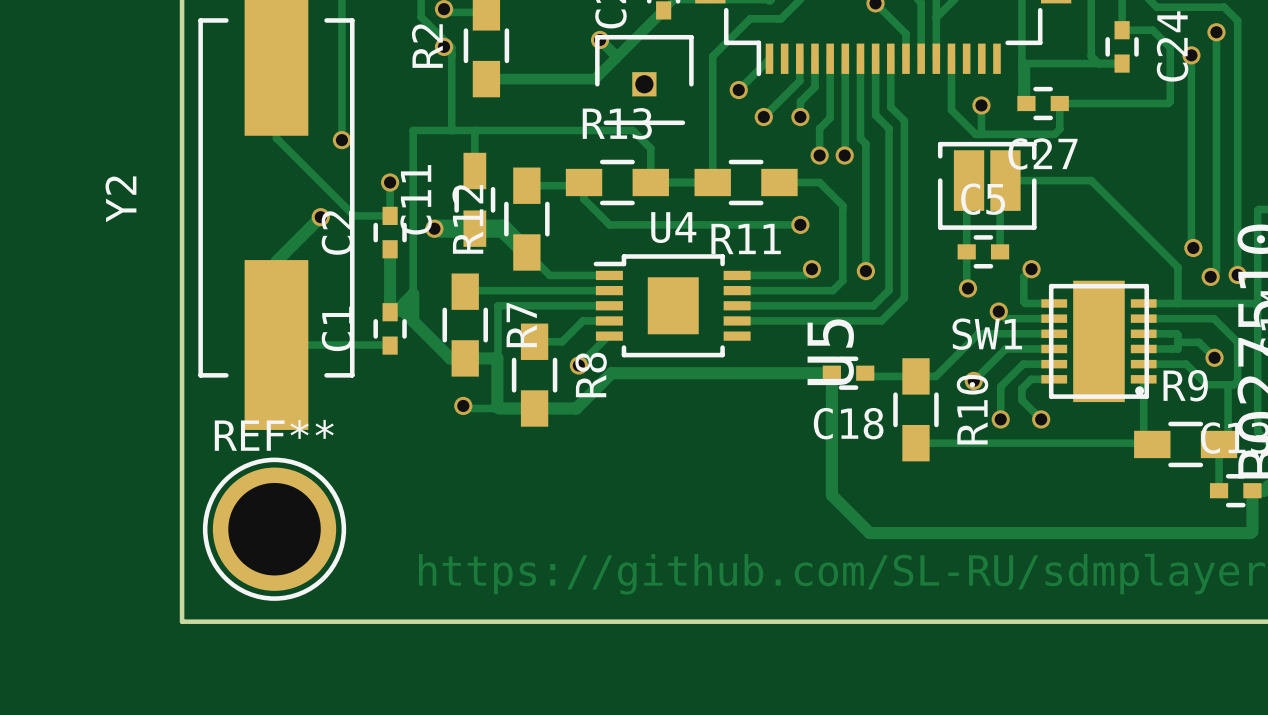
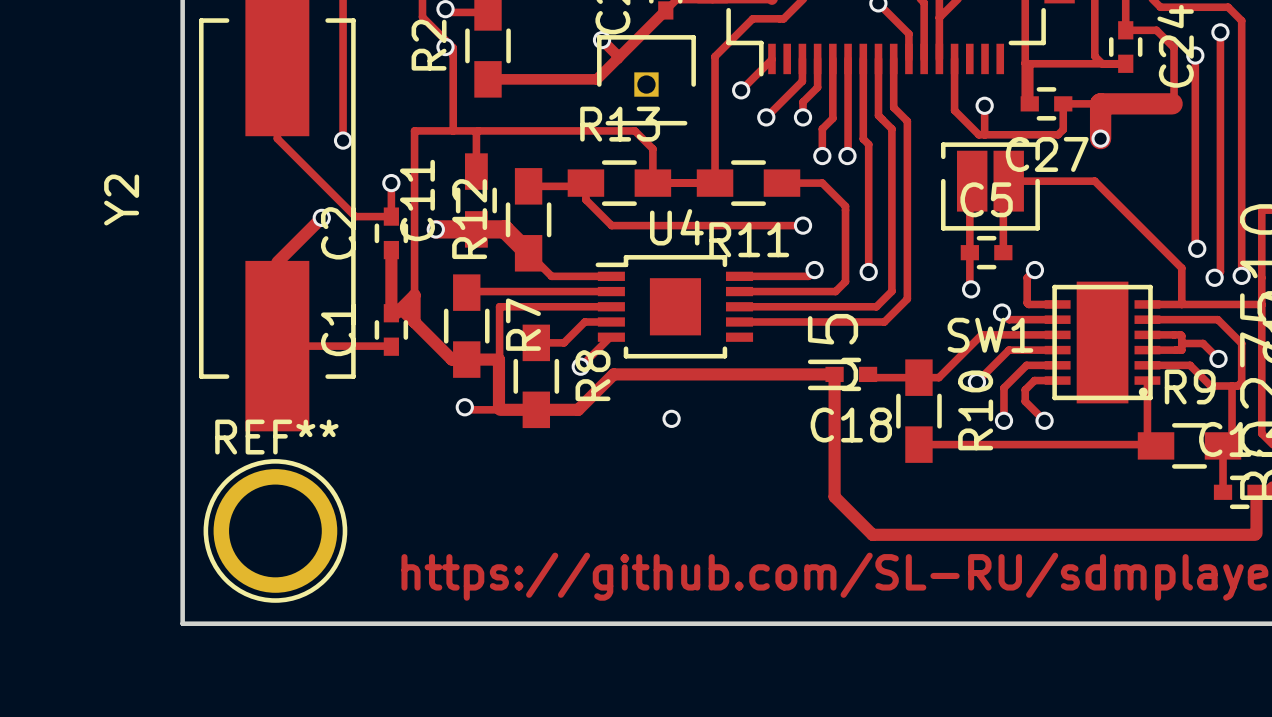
track: none -> (1100, 103) (1100, 138)
track width: thin (1097, 103) (1168, 103) -> thick (1100, 103) (1172, 103)
via: none -> (1100, 138)
via: none -> (671, 418)

